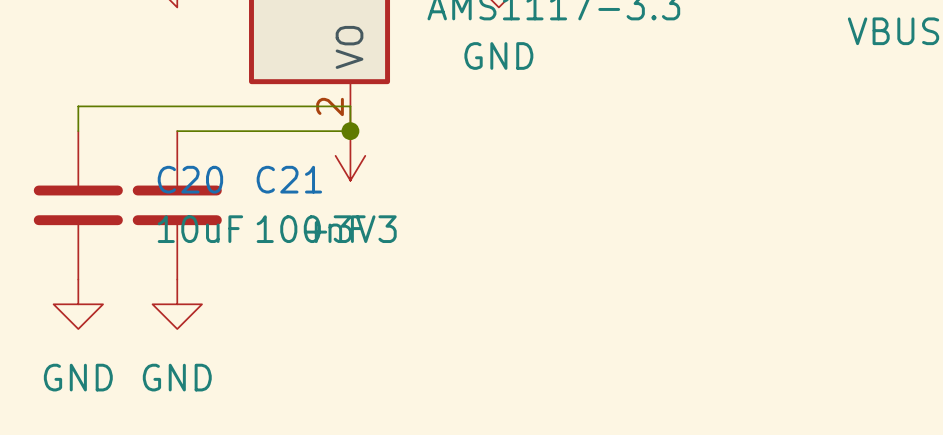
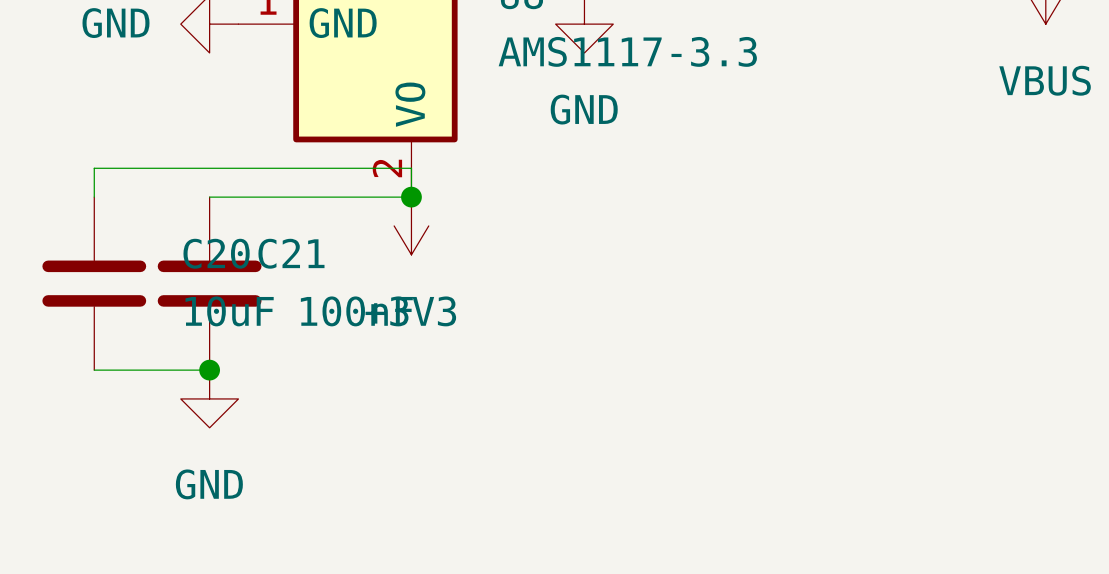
C21 name position: C21 (289, 179) -> C21 (291, 253)
wire: none -> (94, 370) (209, 370)
junction: none -> (209, 370)
power symbol: GND (78, 304) -> none

